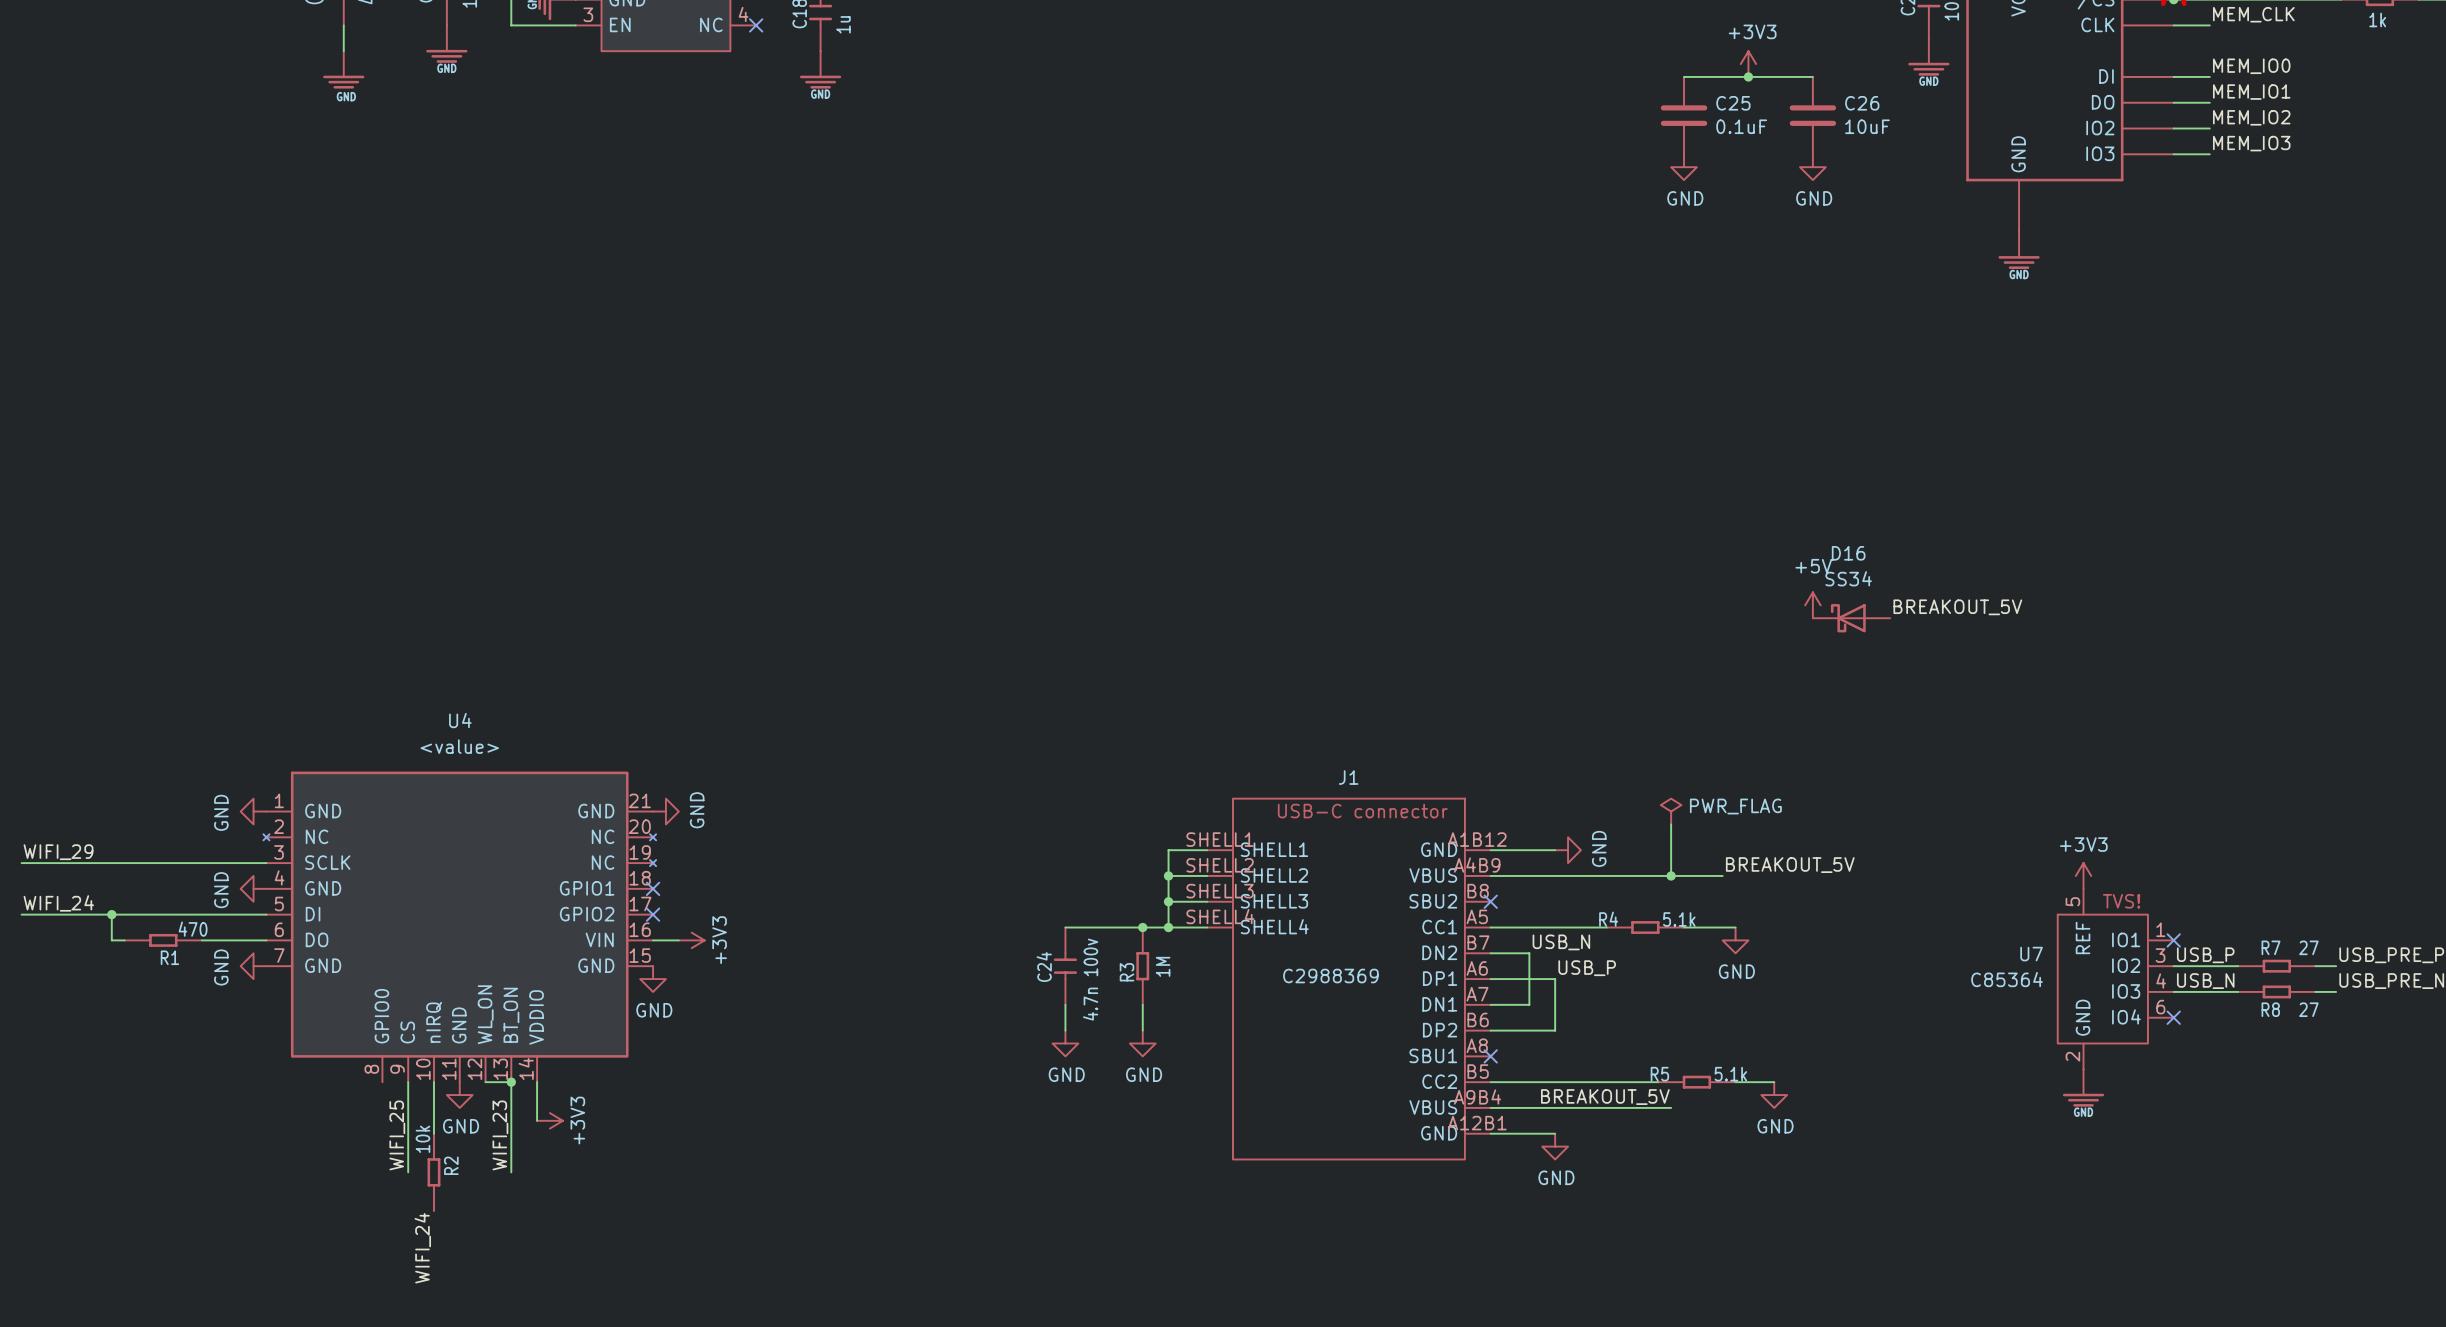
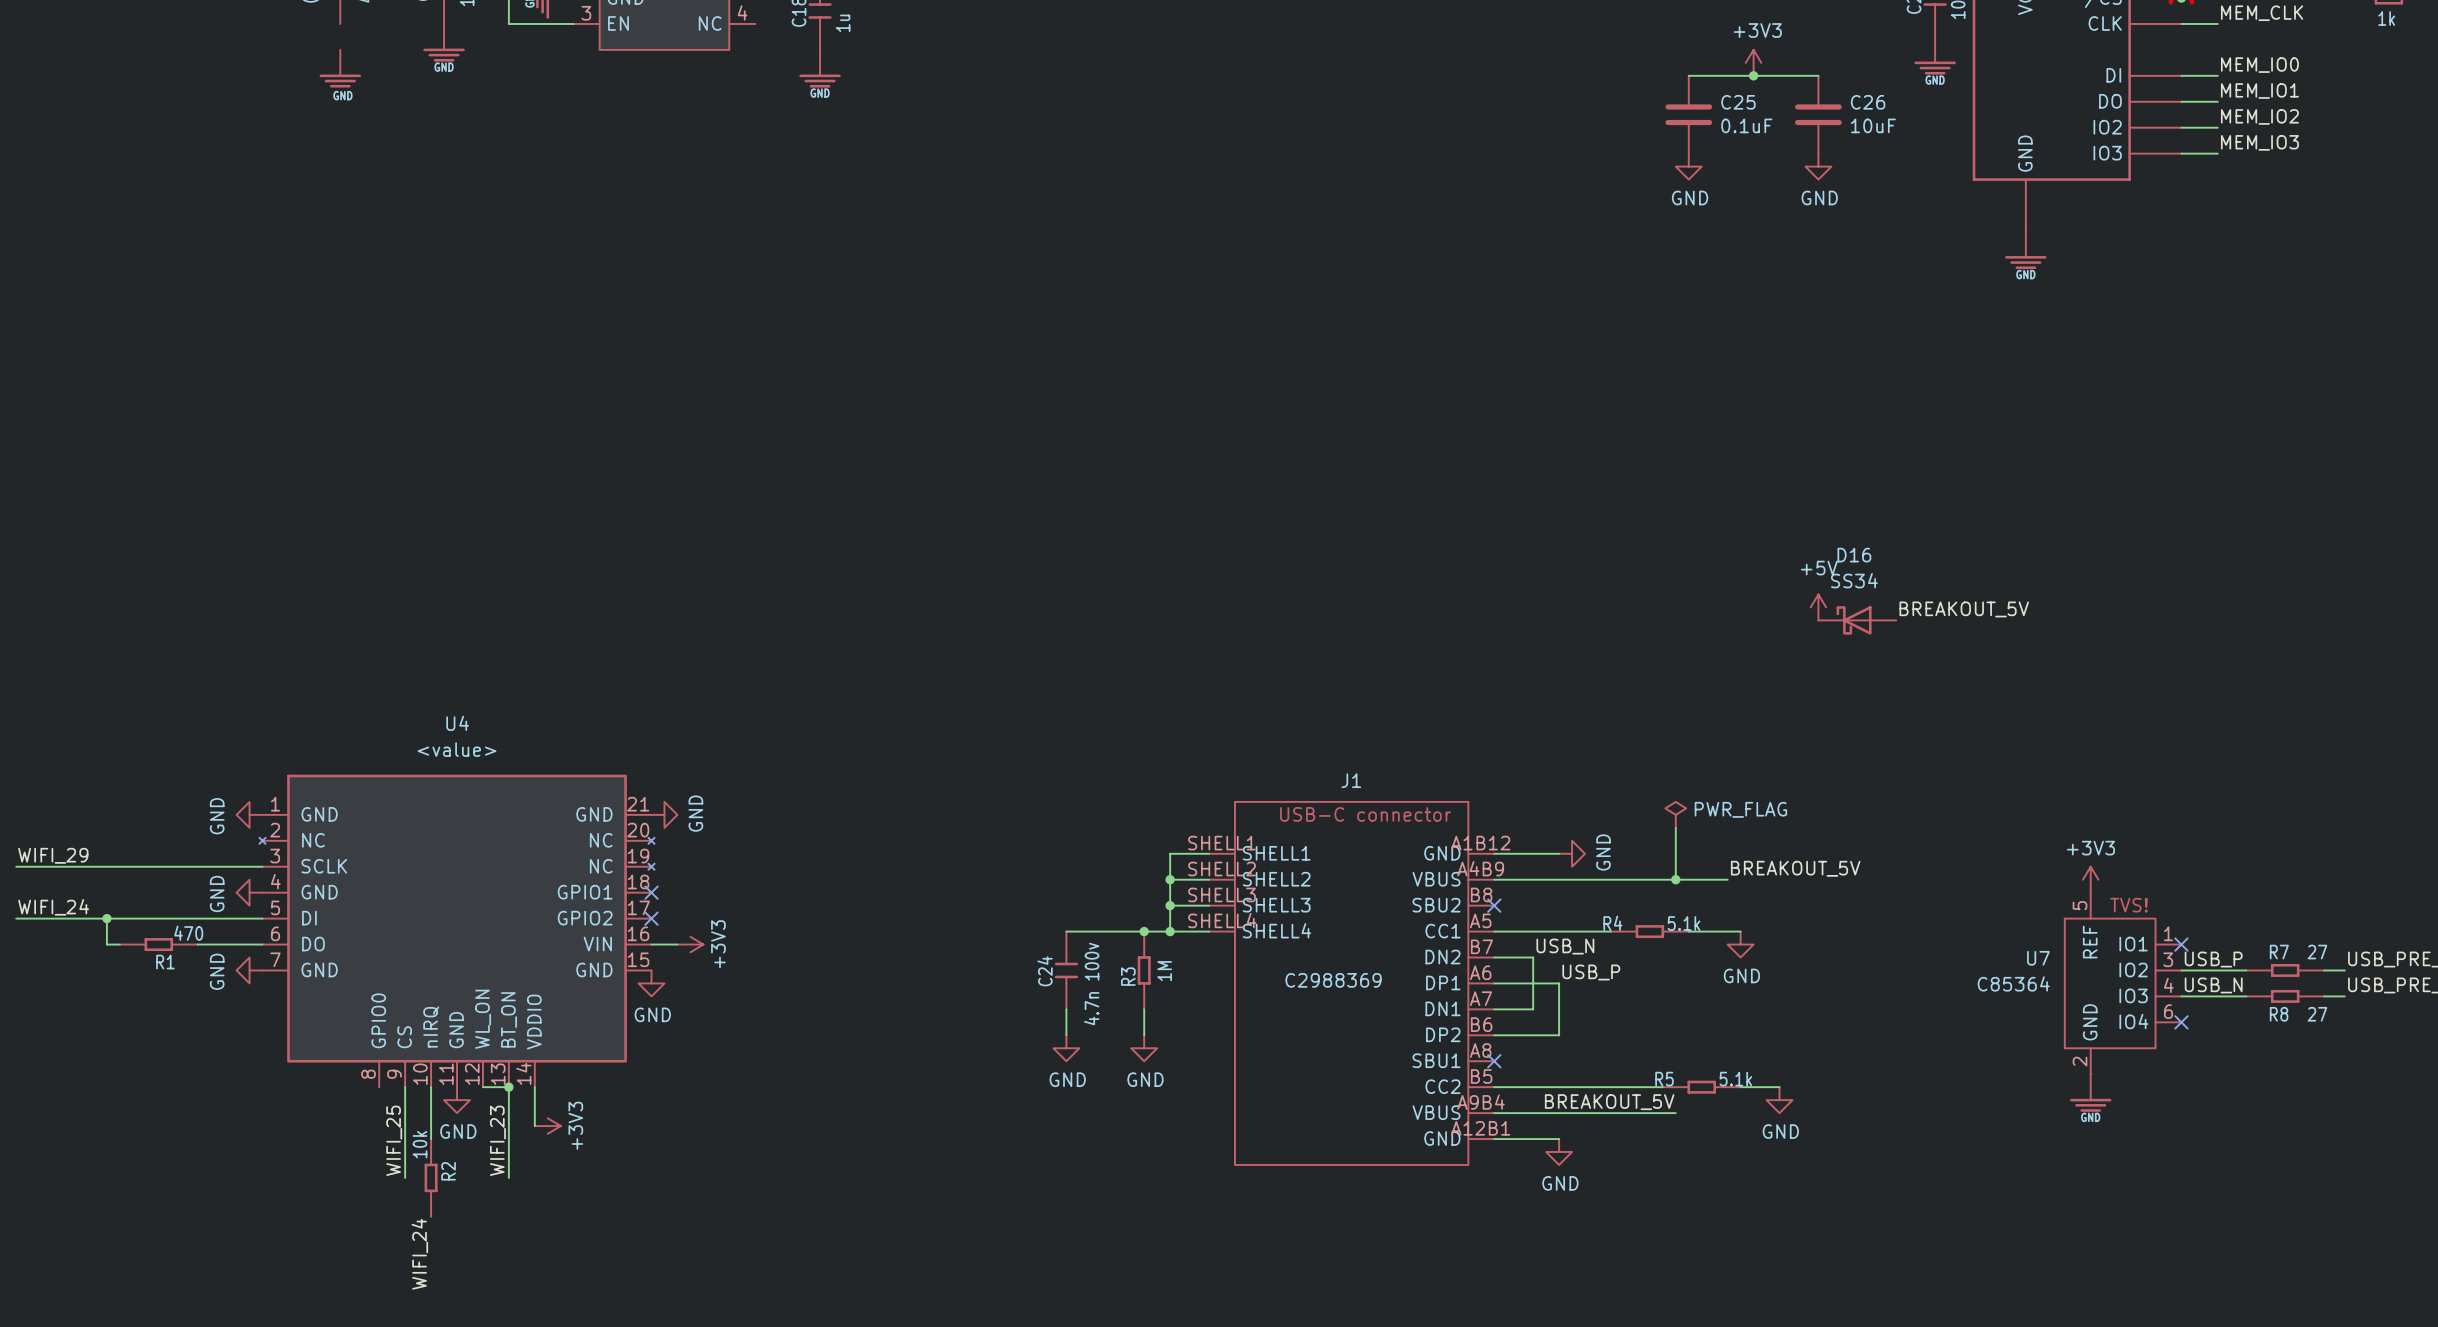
wire: (343, 25) (343, 51) -> none
no-connect mark: (756, 25) -> none

